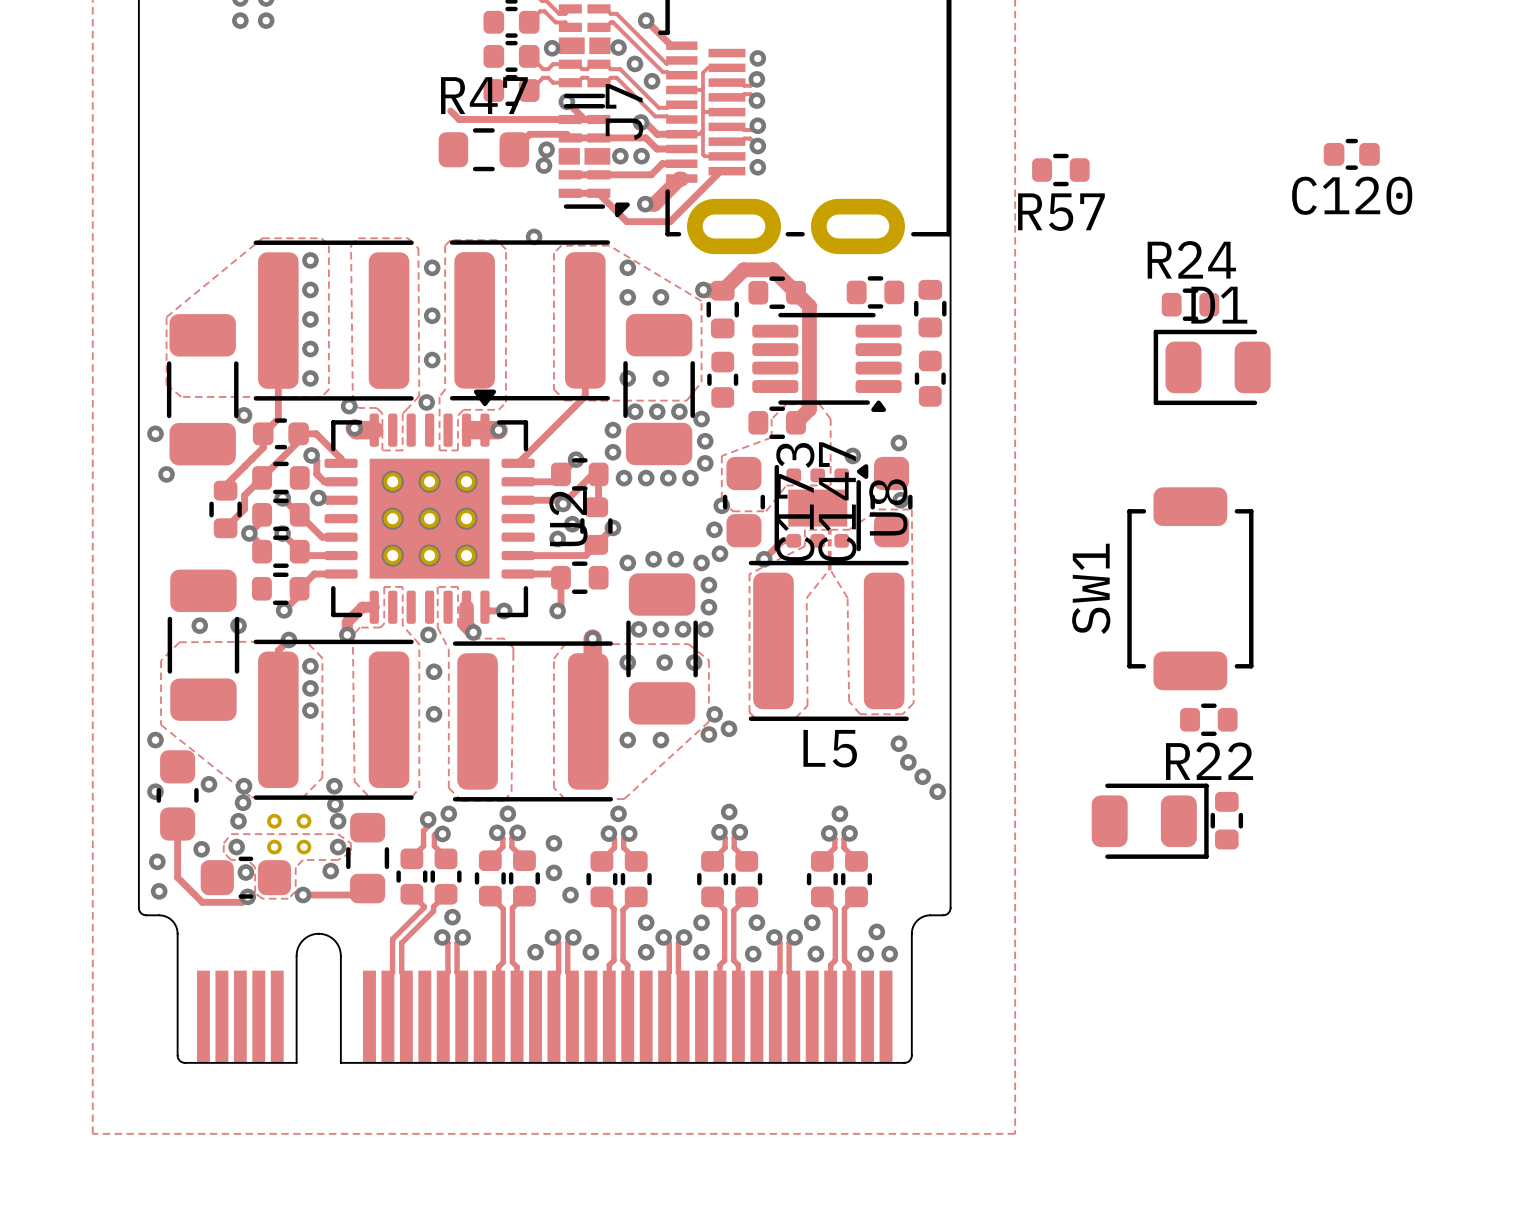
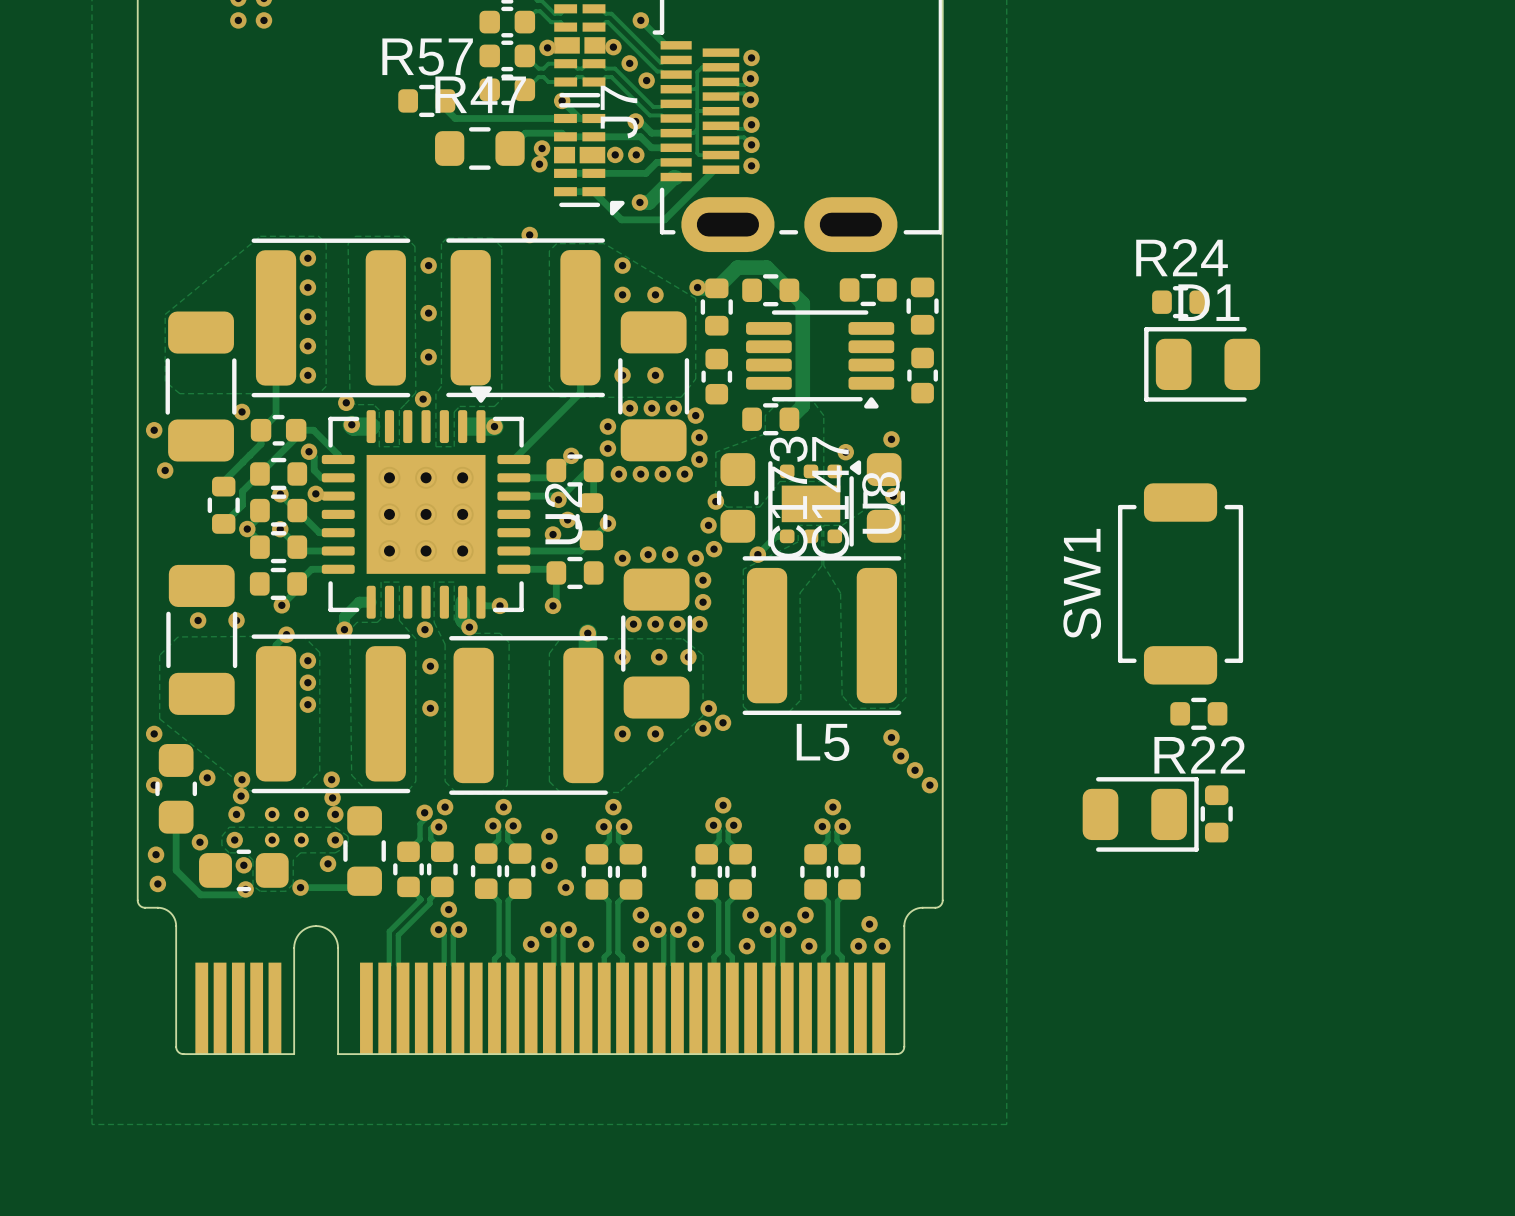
C120: (1351, 154) -> none
R57 position: (1060, 170) -> (426, 100)
R57 name position: R57 (1061, 212) -> R57 (427, 57)

